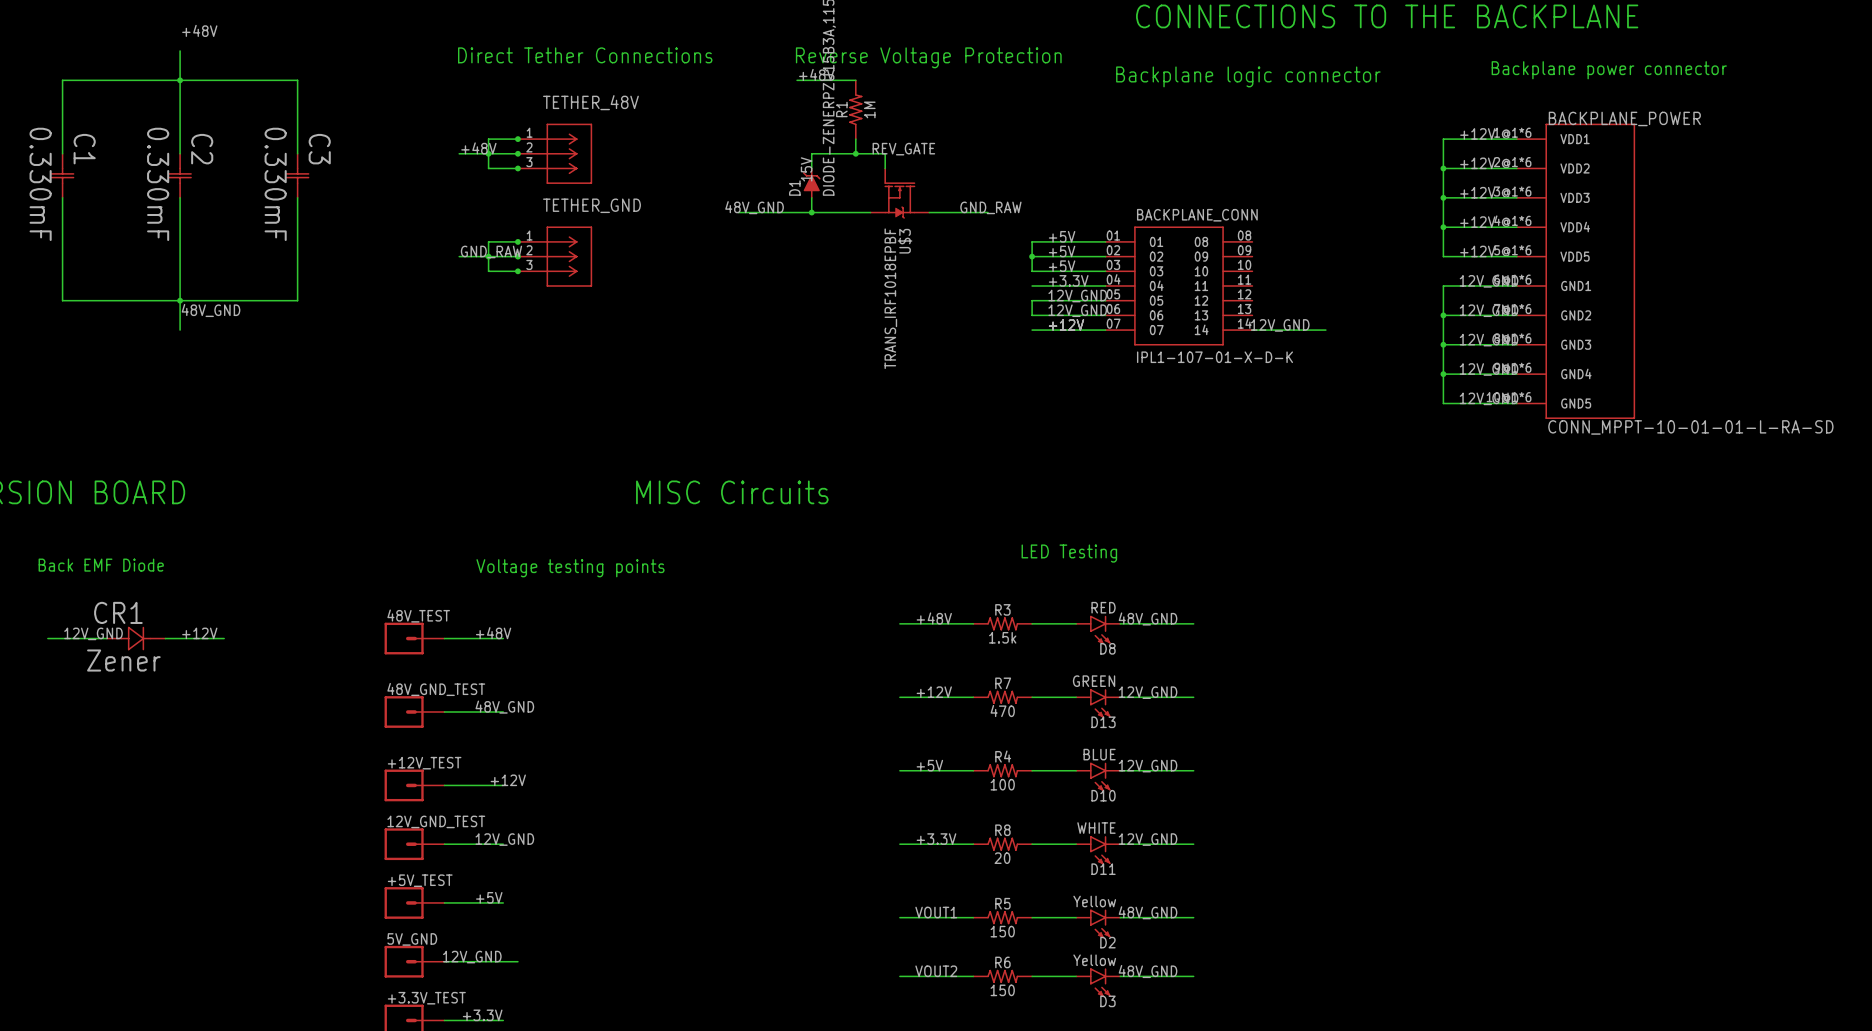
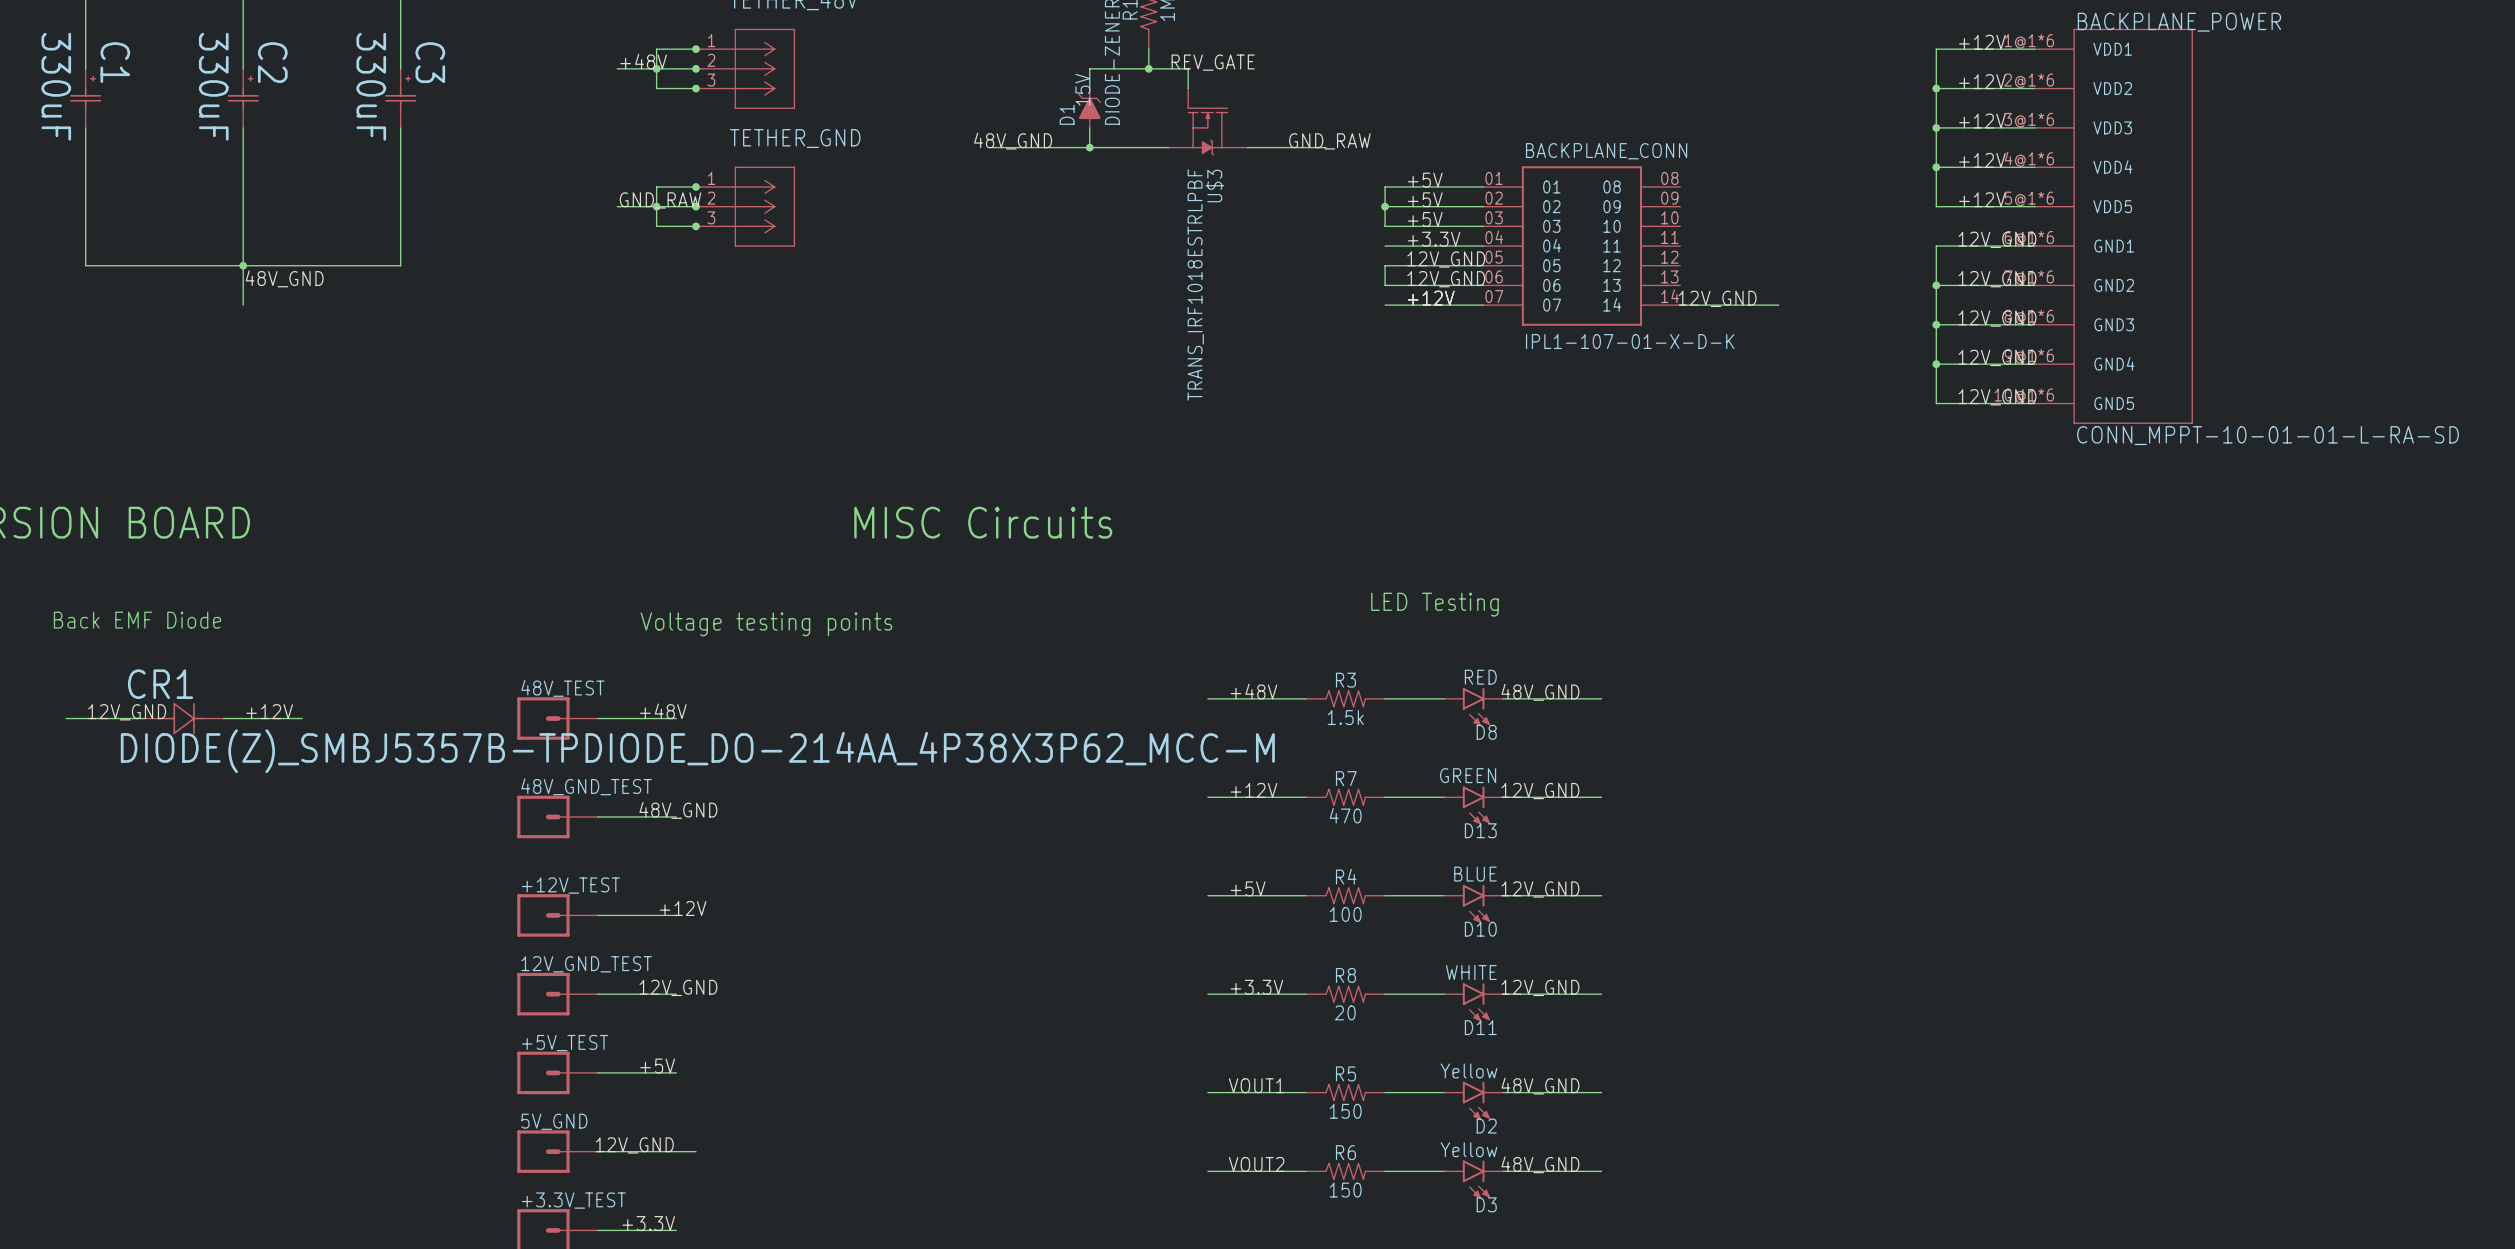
C1 symbol: [50, 153, 75, 198] -> [70, 68, 102, 128]
C2 symbol: [168, 153, 192, 198] -> [227, 68, 259, 128]
C3 symbol: [286, 153, 310, 198] -> [385, 68, 417, 128]
C1 value: 0.330mF (40, 184) -> 330uF (56, 86)
C2 value: 0.330mF (158, 184) -> 330uF (213, 86)
C3 value: 0.330mF (275, 184) -> 330uF (371, 86)
U$3 value: TRANS_IRF1018EPBF (890, 298) -> TRANS_IRF1018ESTRLPBF (1195, 284)
CR1 value: Zener (123, 660) -> DIODE(Z)_SMBJ5357B-TPDIODE_DO-214AA_4P38X3P62_MCC-M (697, 751)

